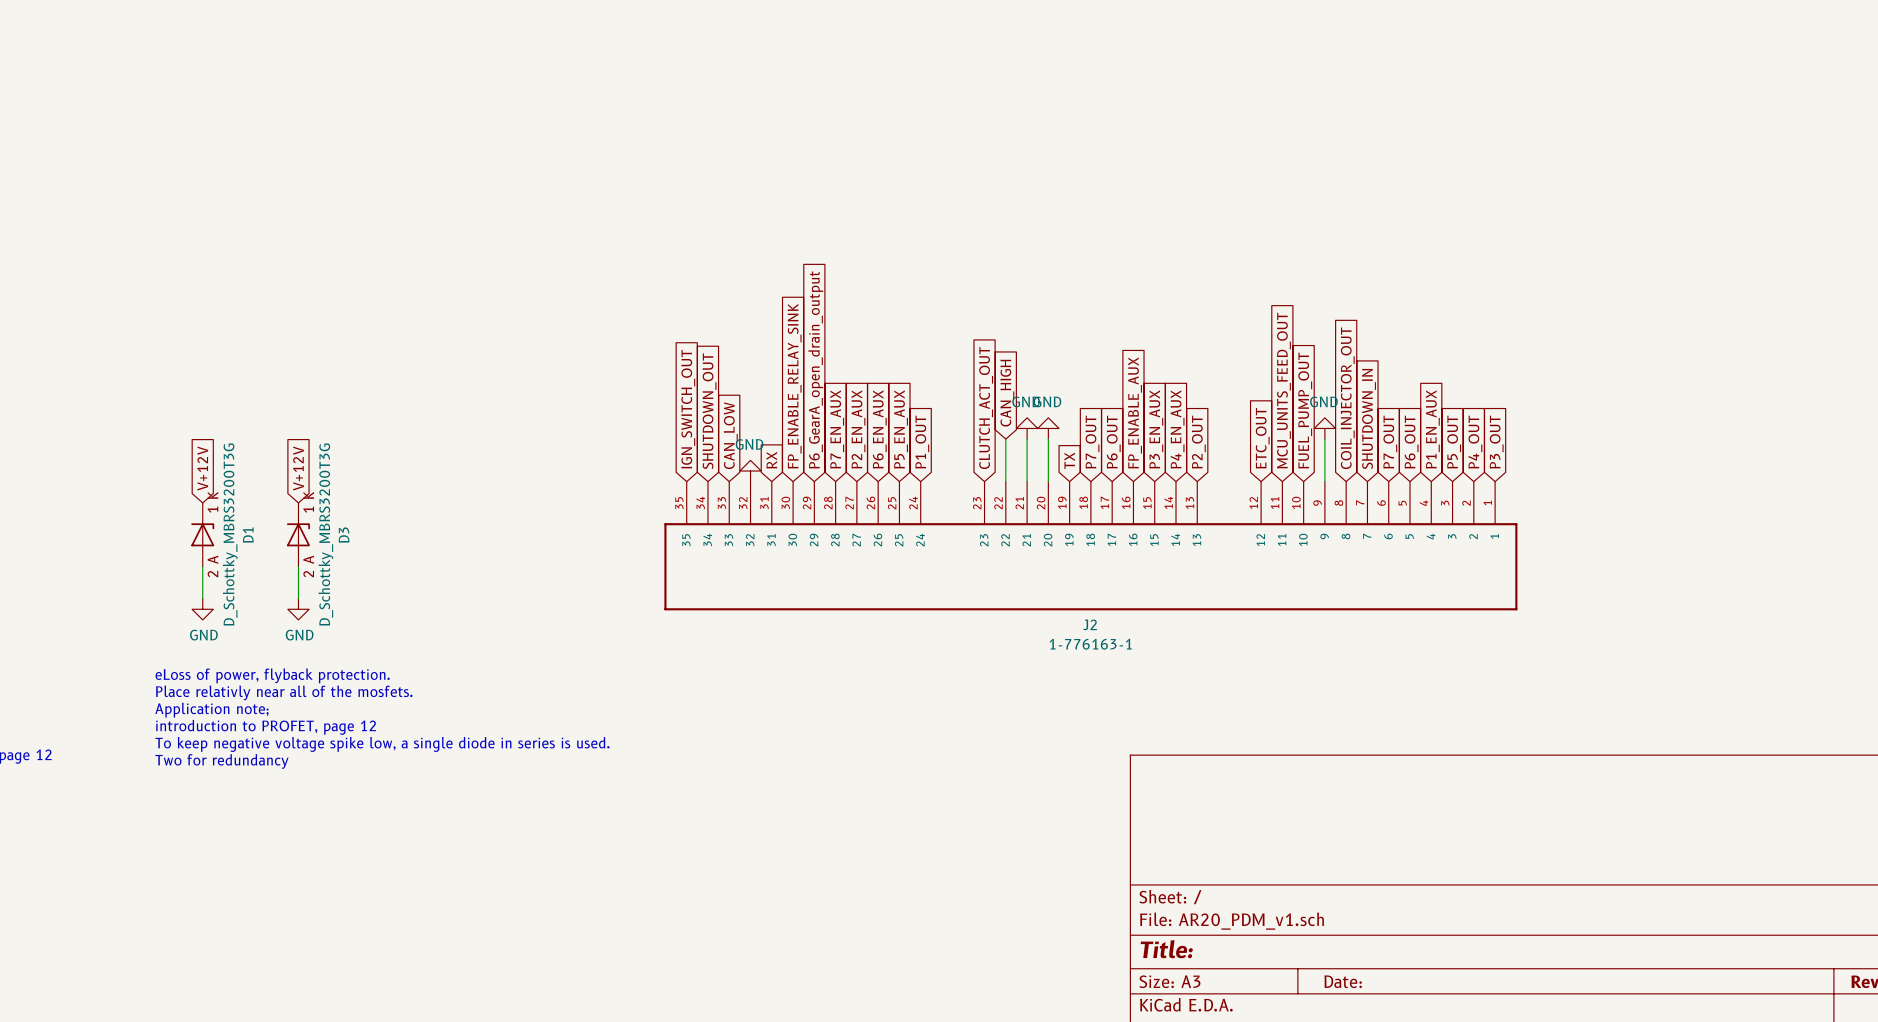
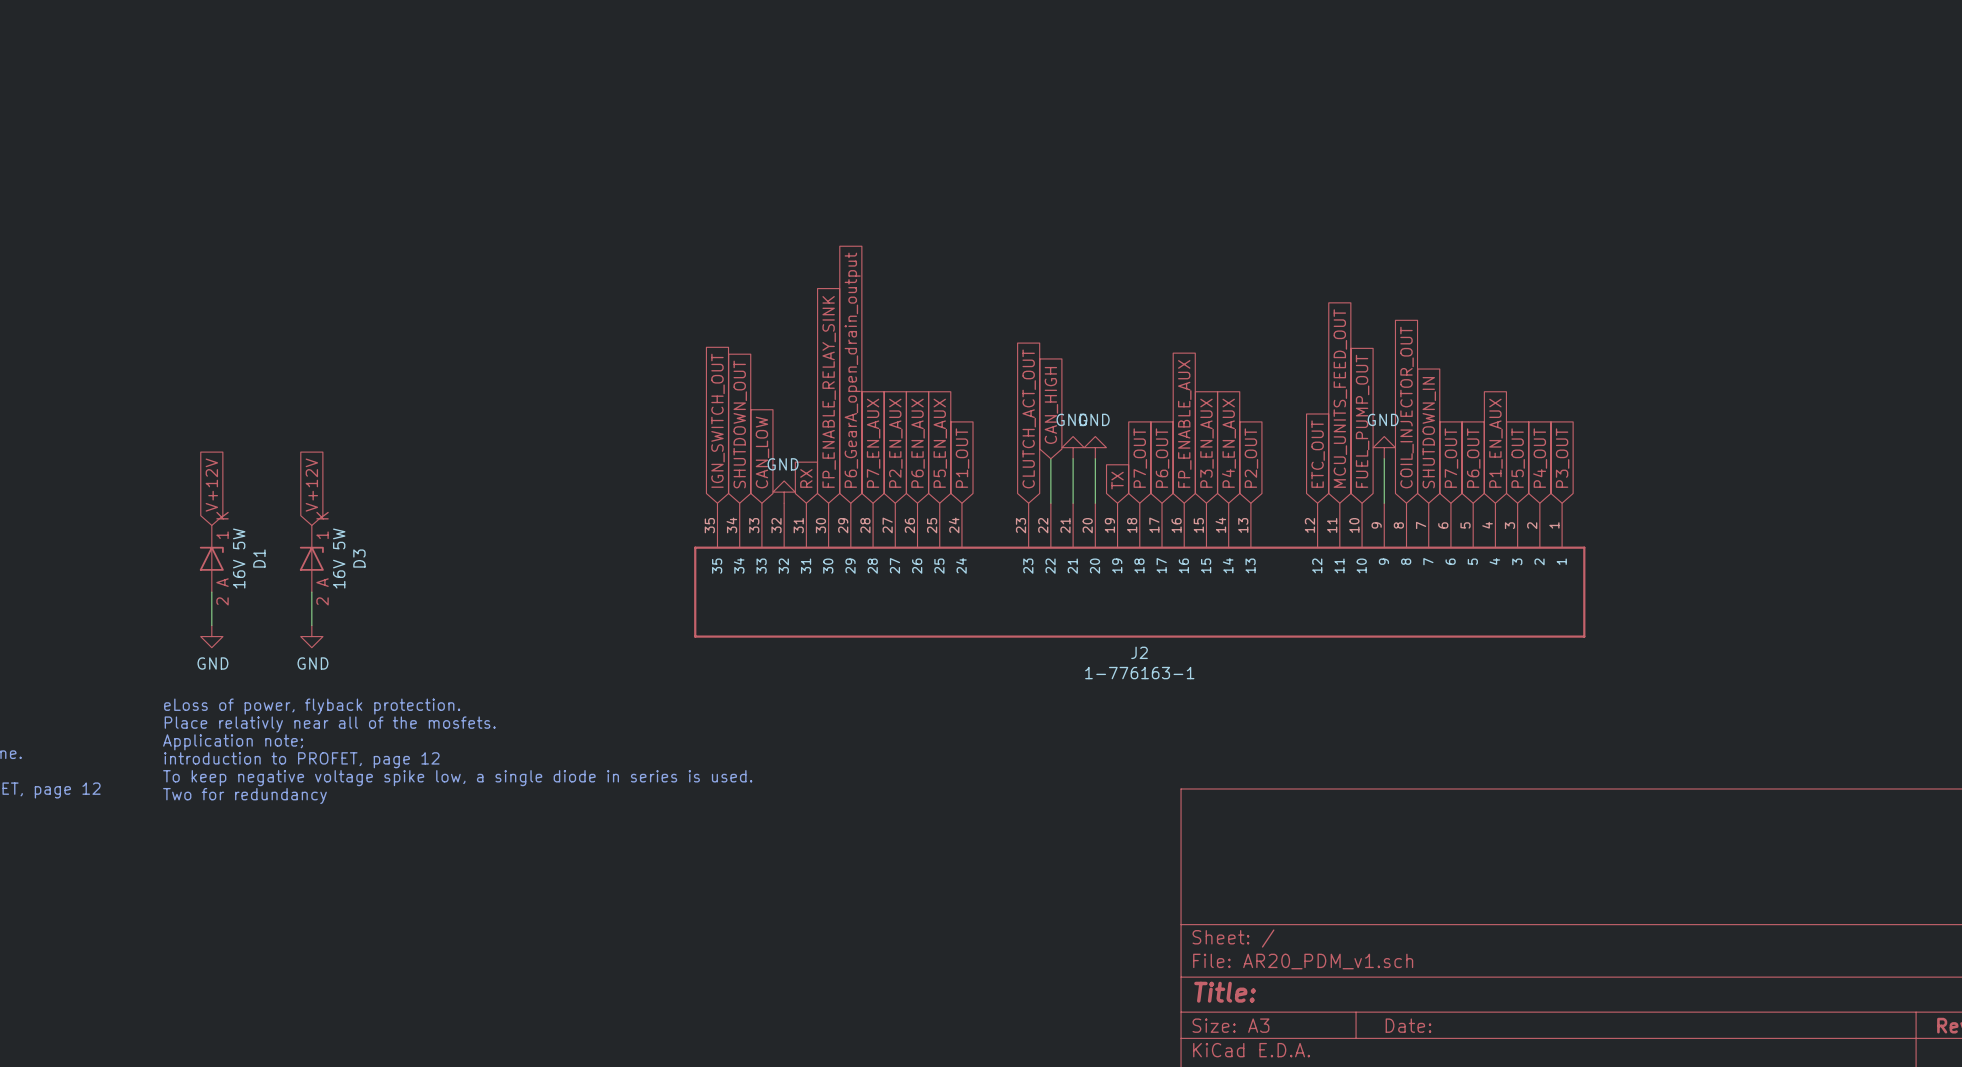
D1 value: D_Schottky_MBRS3200T3G (230, 534) -> 16V 5W (239, 558)
D3 value: D_Schottky_MBRS3200T3G (325, 534) -> 16V 5W (339, 558)

